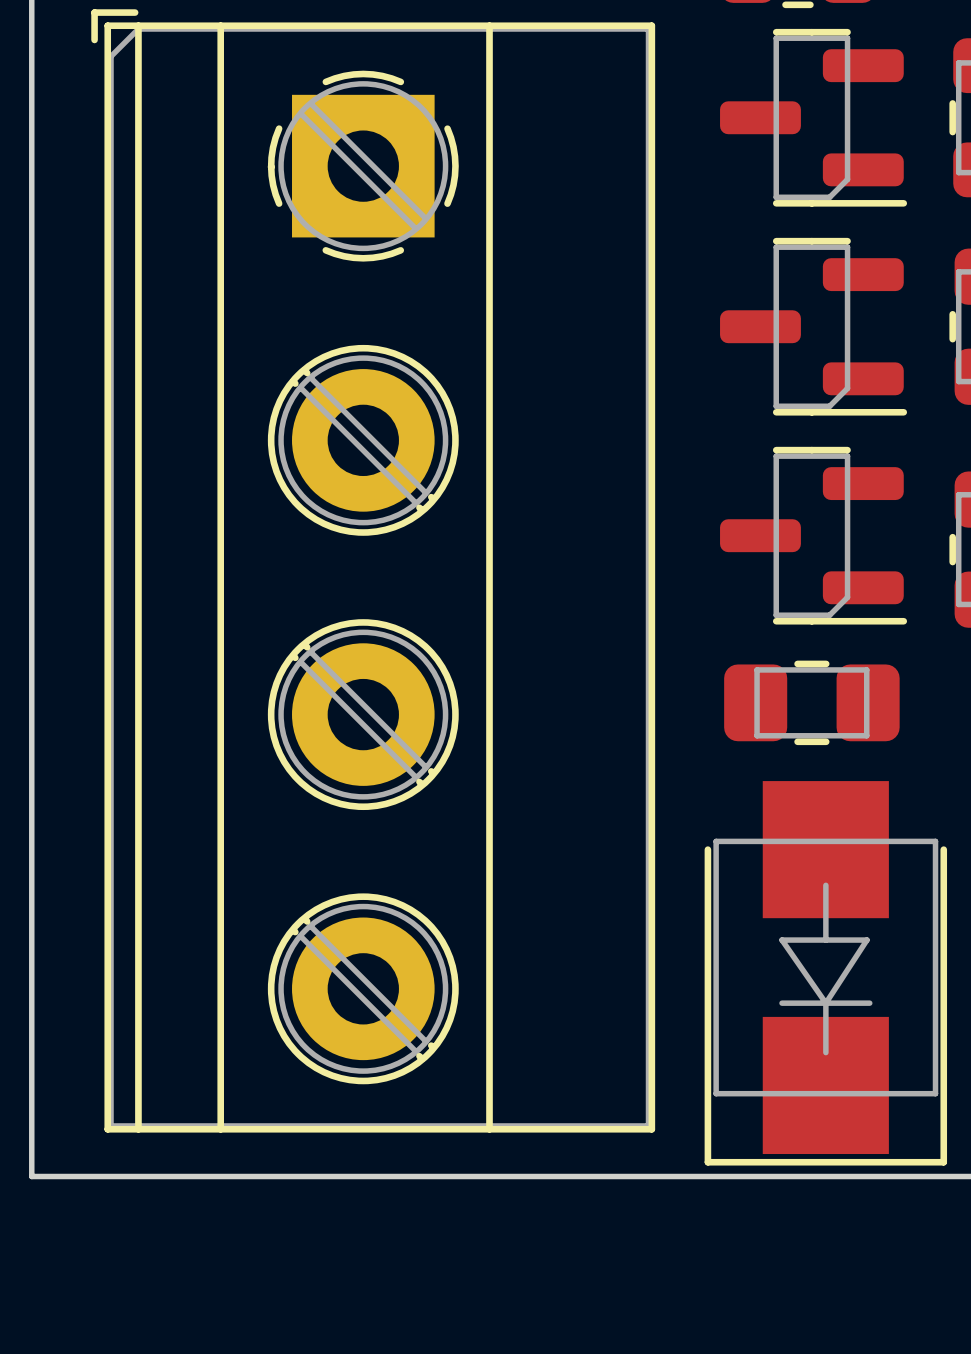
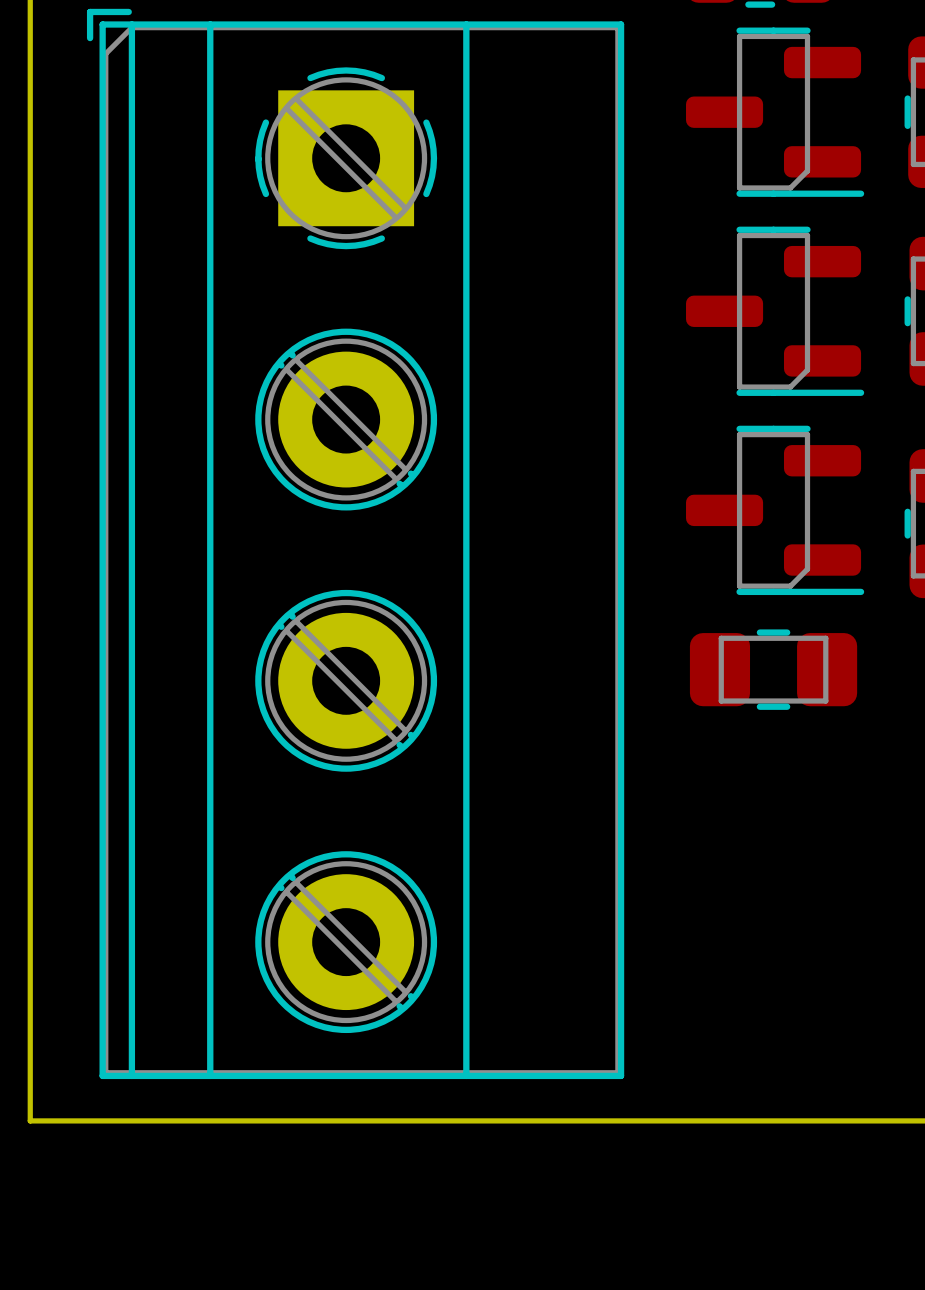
part: (825, 973) -> none

